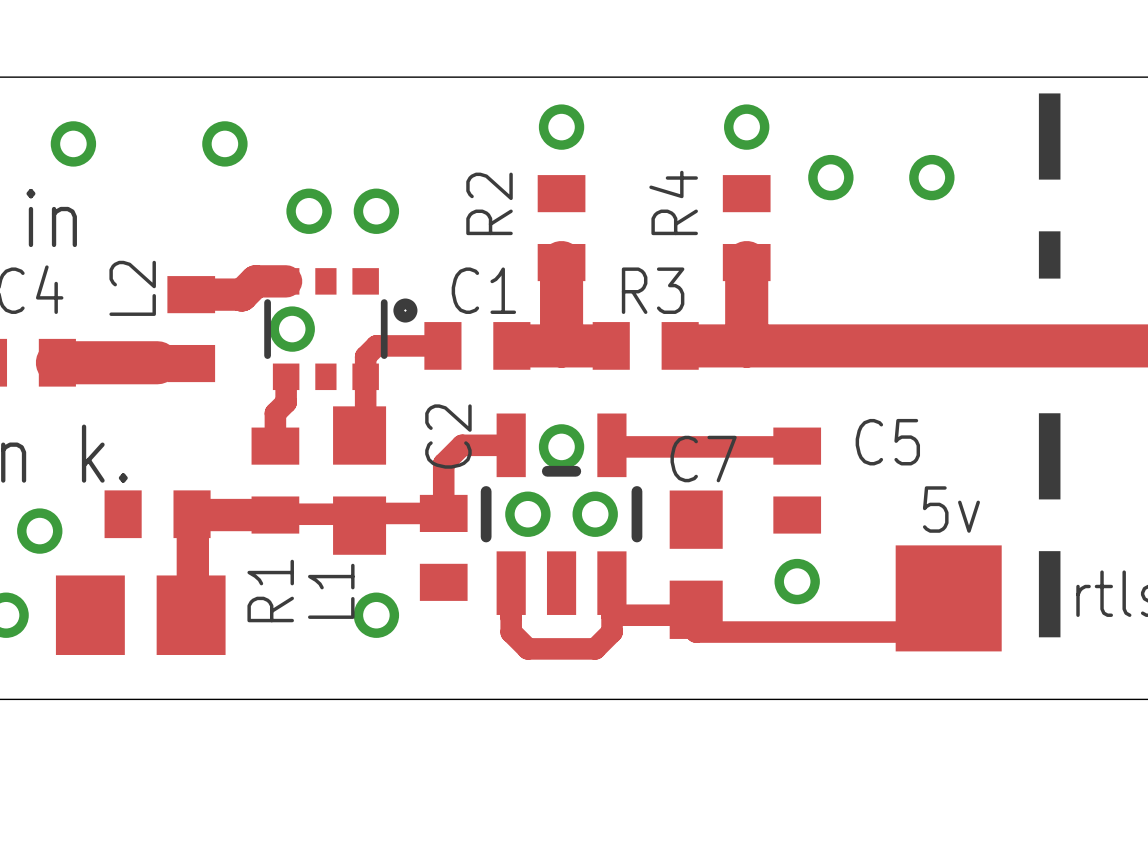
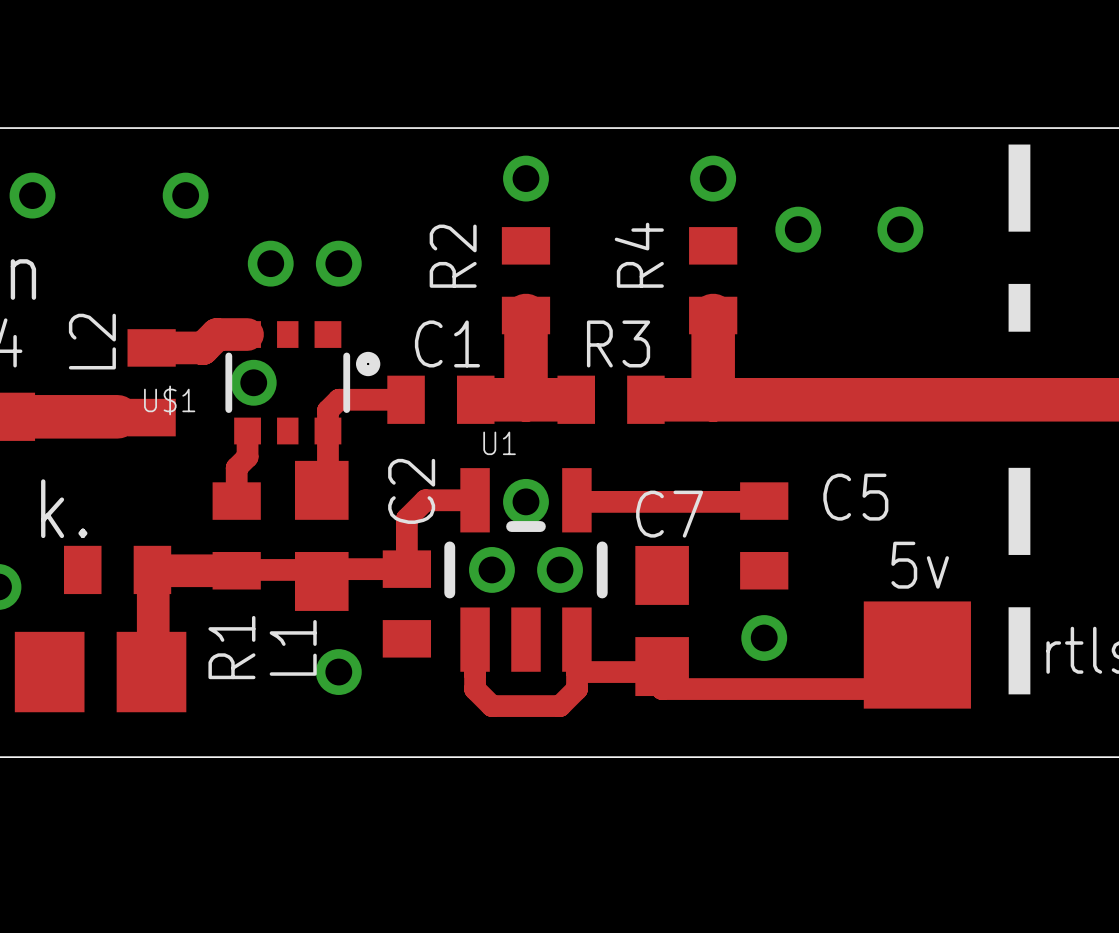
U$1 name: none -> U$1 (169, 400)
U1 name: none -> U1 (499, 443)

